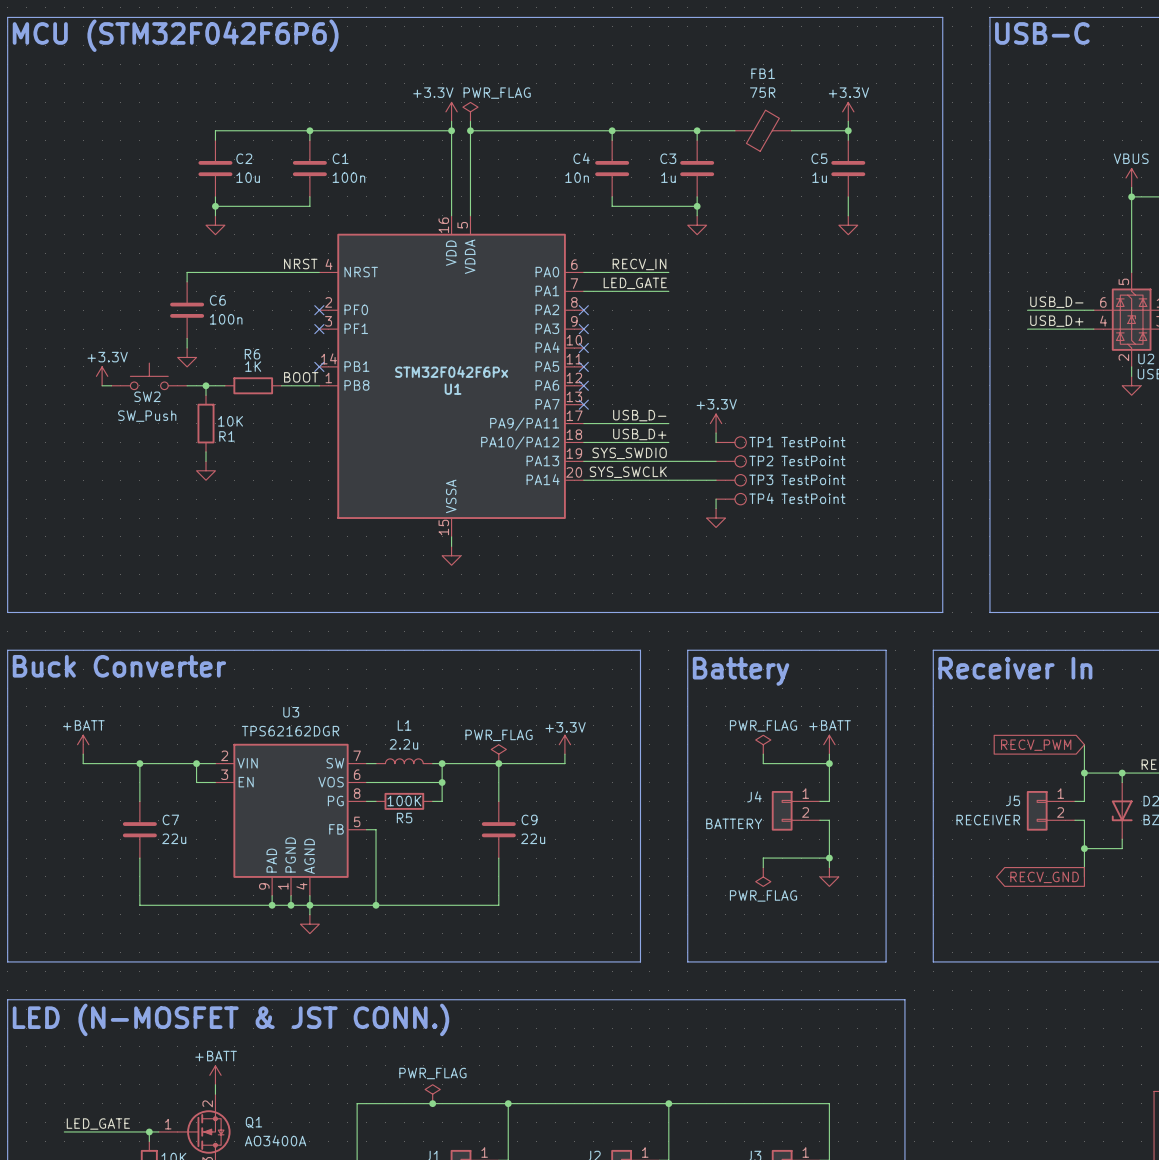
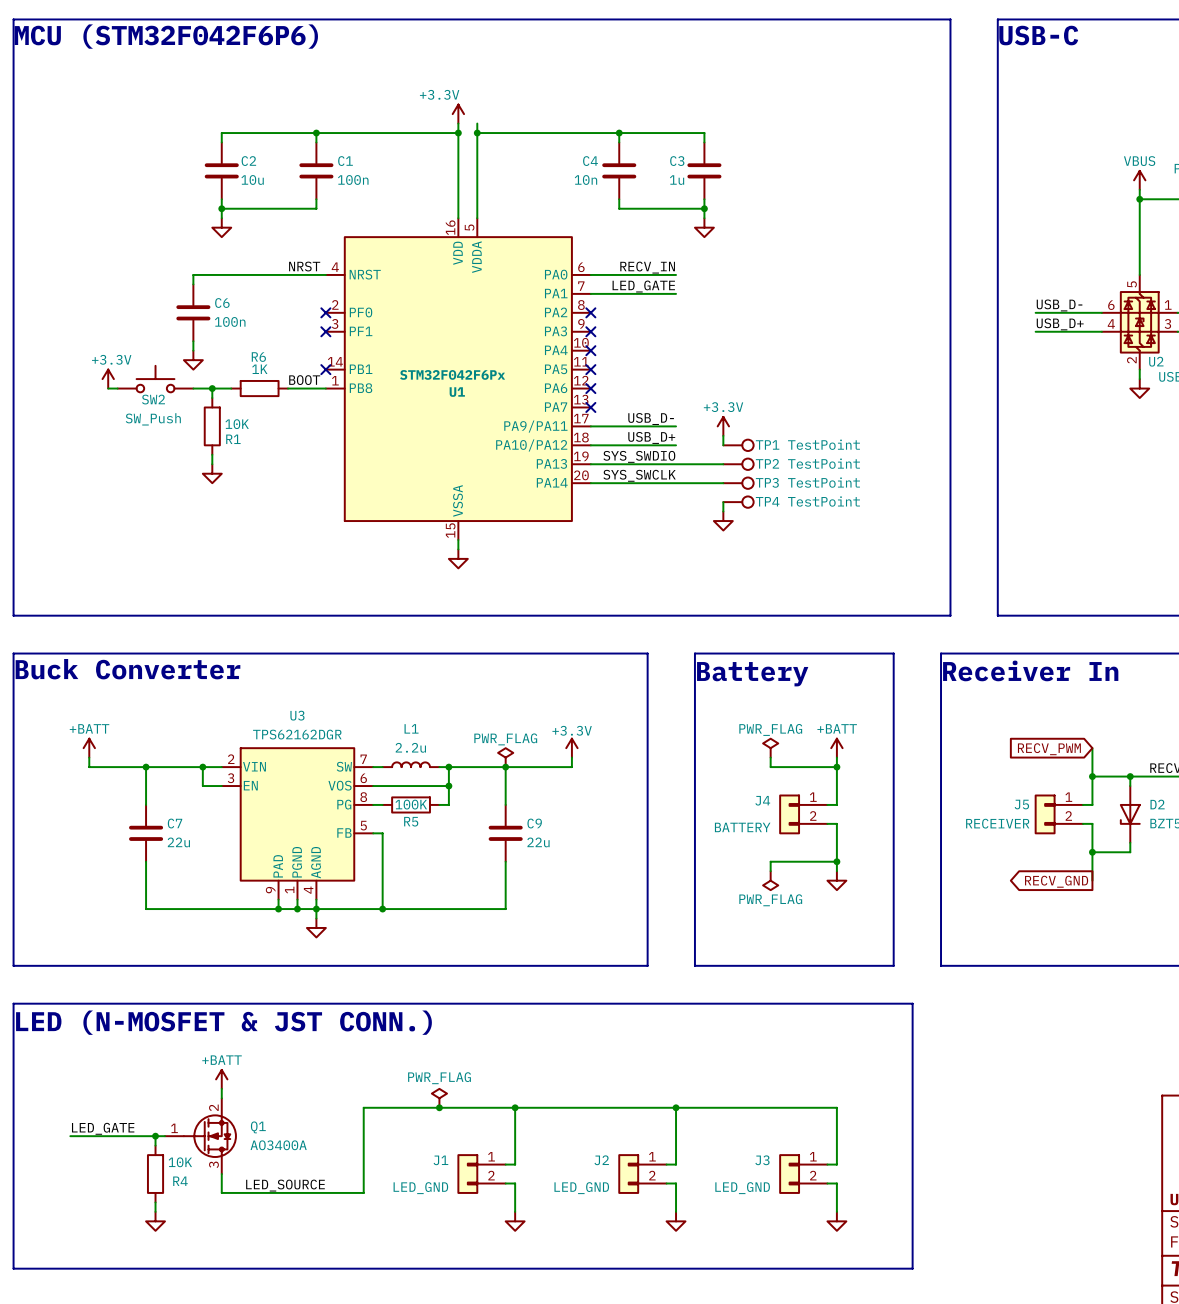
power symbol: PWR_FLAG (470, 111) -> none
power symbol: +3.3V (848, 111) -> none
wire: (848, 121) (848, 140) -> none
wire: (697, 130) (734, 130) -> none
junction: (697, 130) -> none
FB1: 75R (763, 130) -> none
wire: (791, 130) (848, 130) -> none
junction: (848, 130) -> none
C5: 1u (848, 168) -> none
wire: (848, 196) (848, 215) -> none
power symbol: (848, 225) -> none

